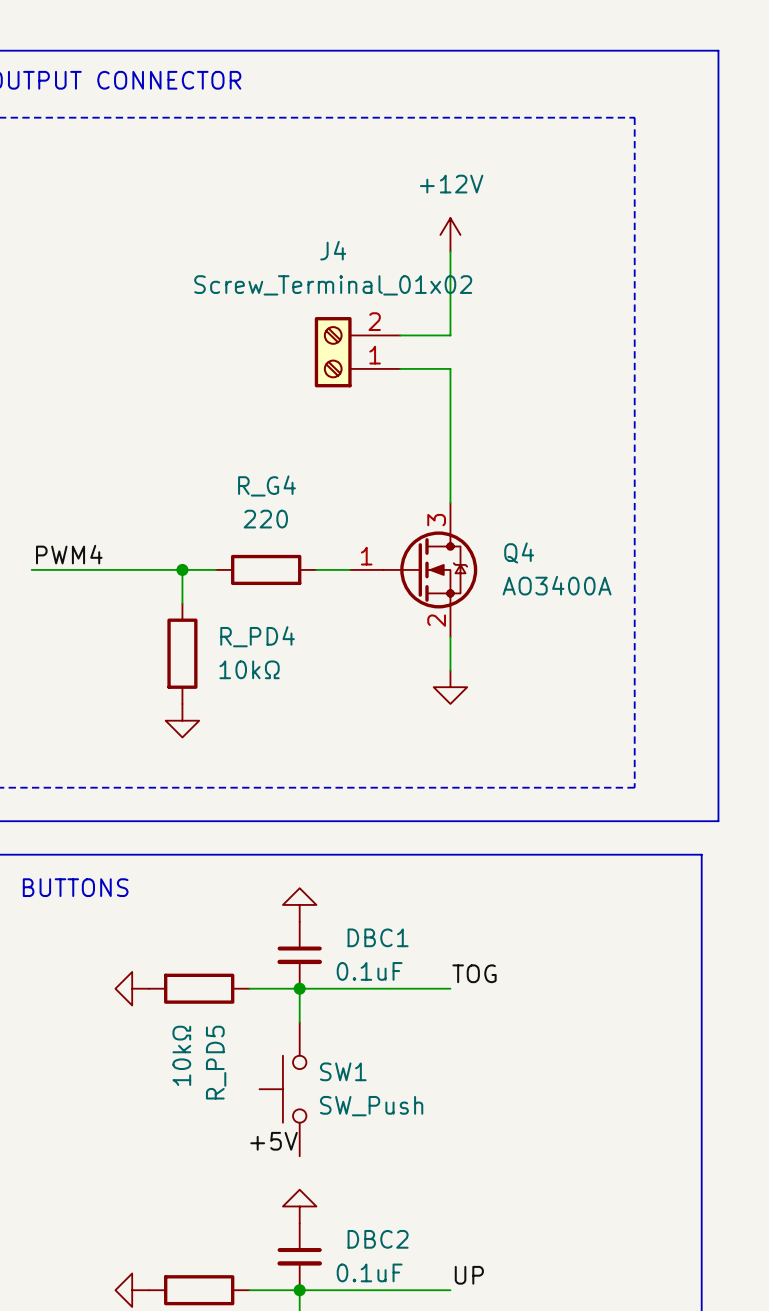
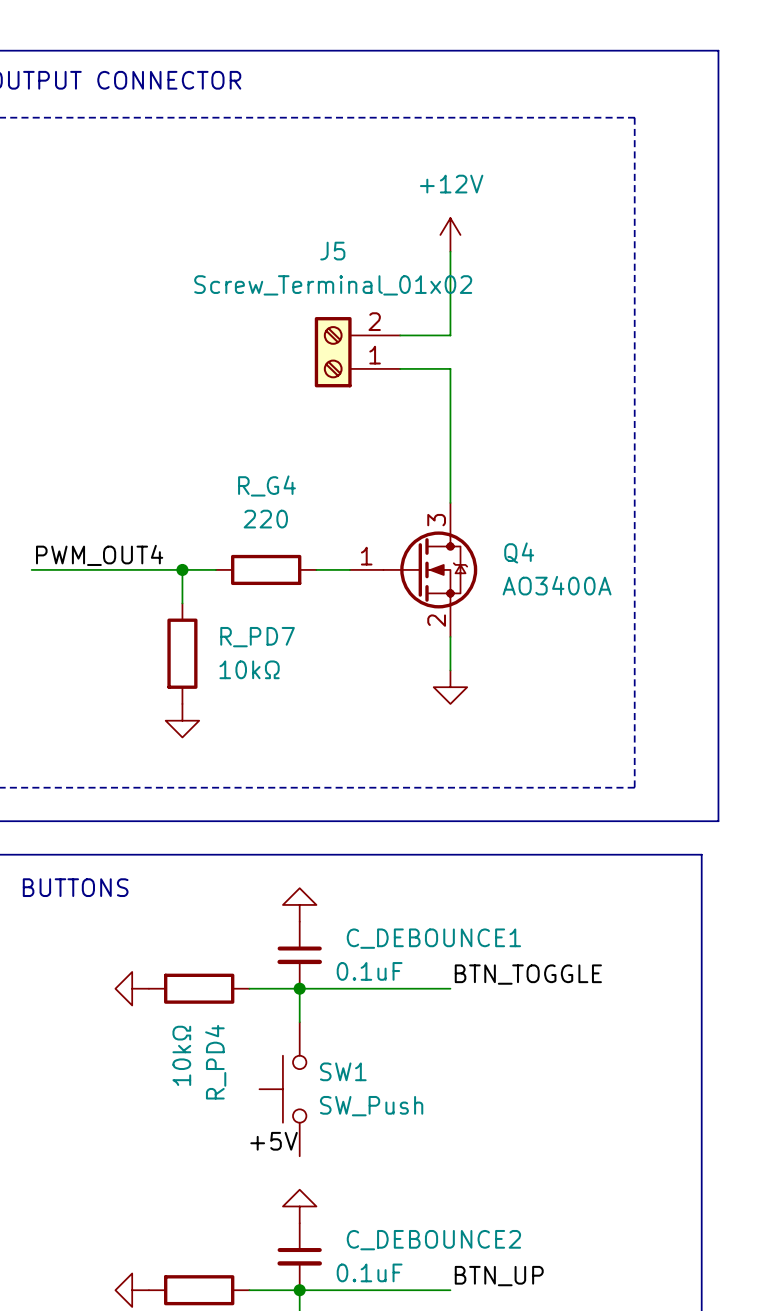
J4 name: J4 (333, 250) -> J5 (332, 251)
label: PWM4 (69, 554) -> PWM_OUT4 (99, 555)
R_PD4 name: R_PD4 (257, 636) -> R_PD7 (257, 637)
DBC1 name: DBC1 (378, 937) -> C_DEBOUNCE1 (433, 938)
label: TOG (474, 973) -> BTN_TOGGLE (528, 974)
R_PD5 name: R_PD5 (216, 1062) -> R_PD4 (215, 1062)
DBC2 name: DBC2 (378, 1239) -> C_DEBOUNCE2 (433, 1240)
label: UP (469, 1275) -> BTN_UP (499, 1276)

